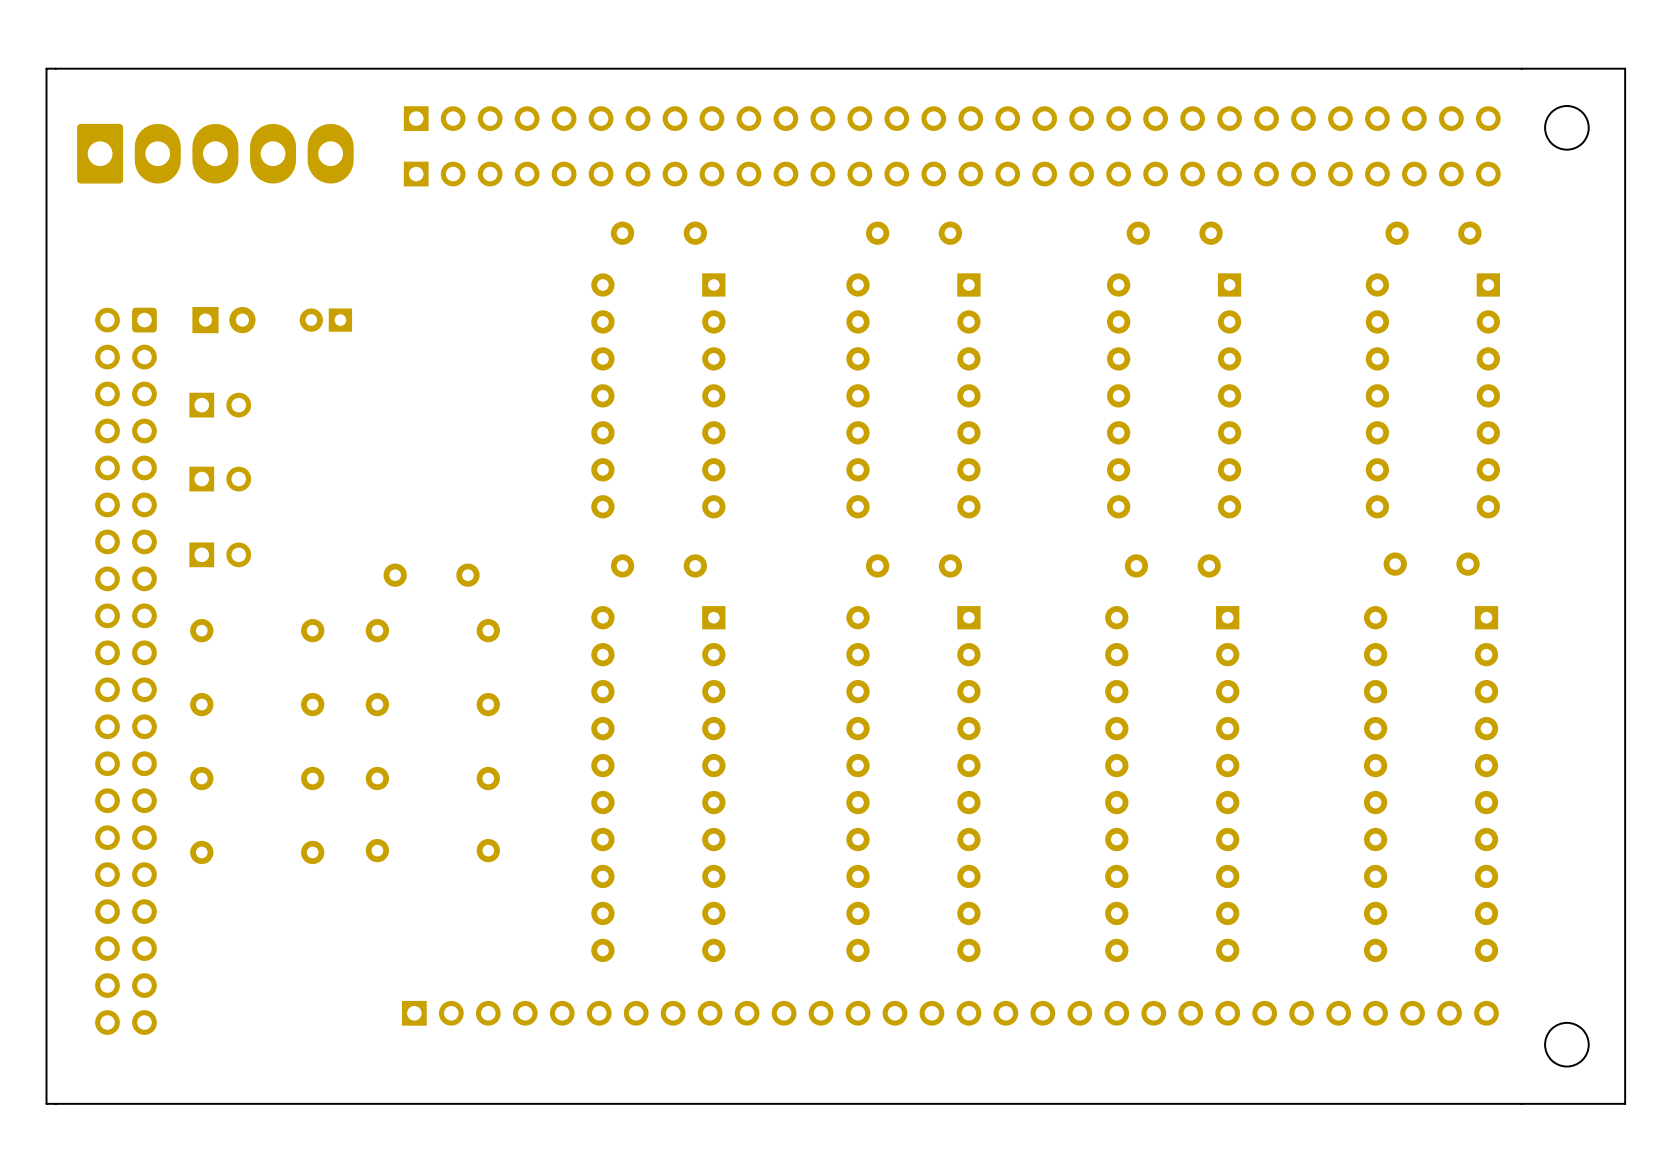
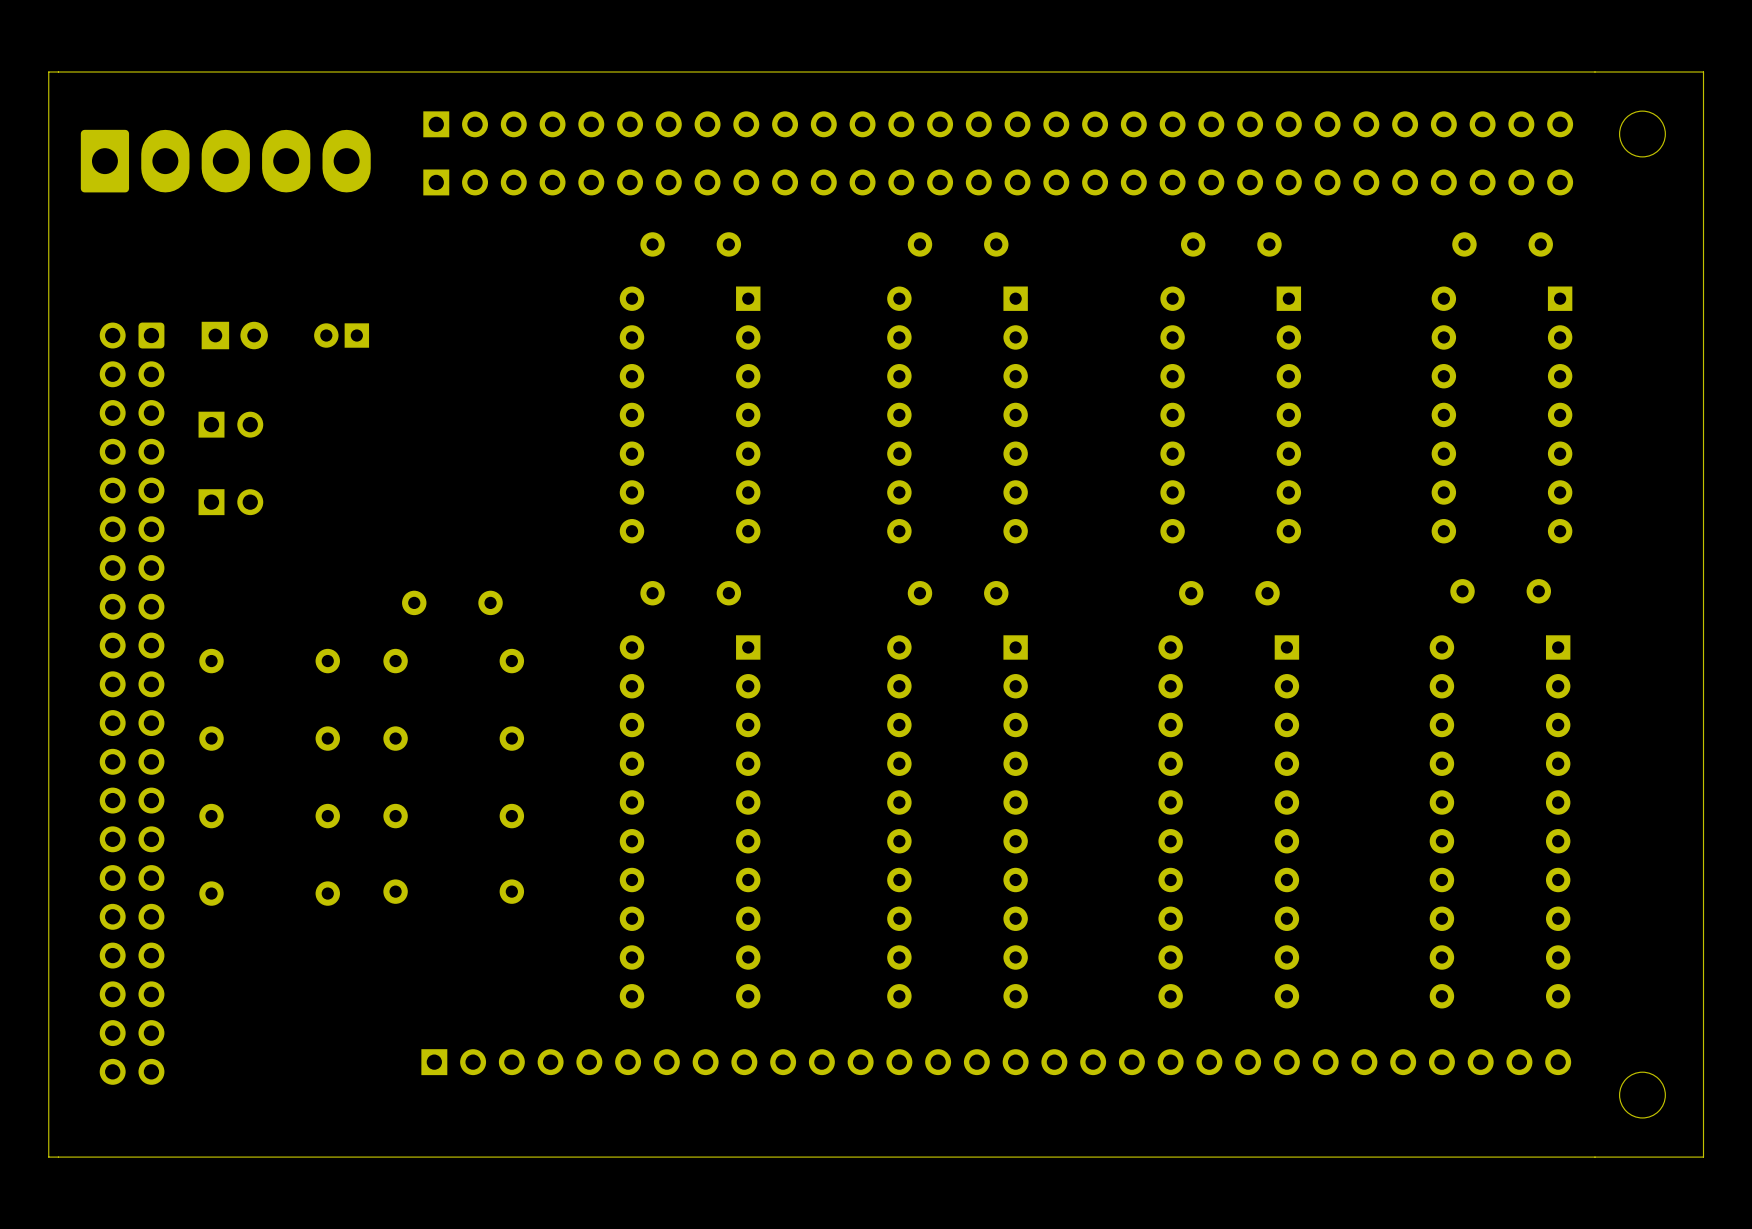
part: (220, 554) -> none

